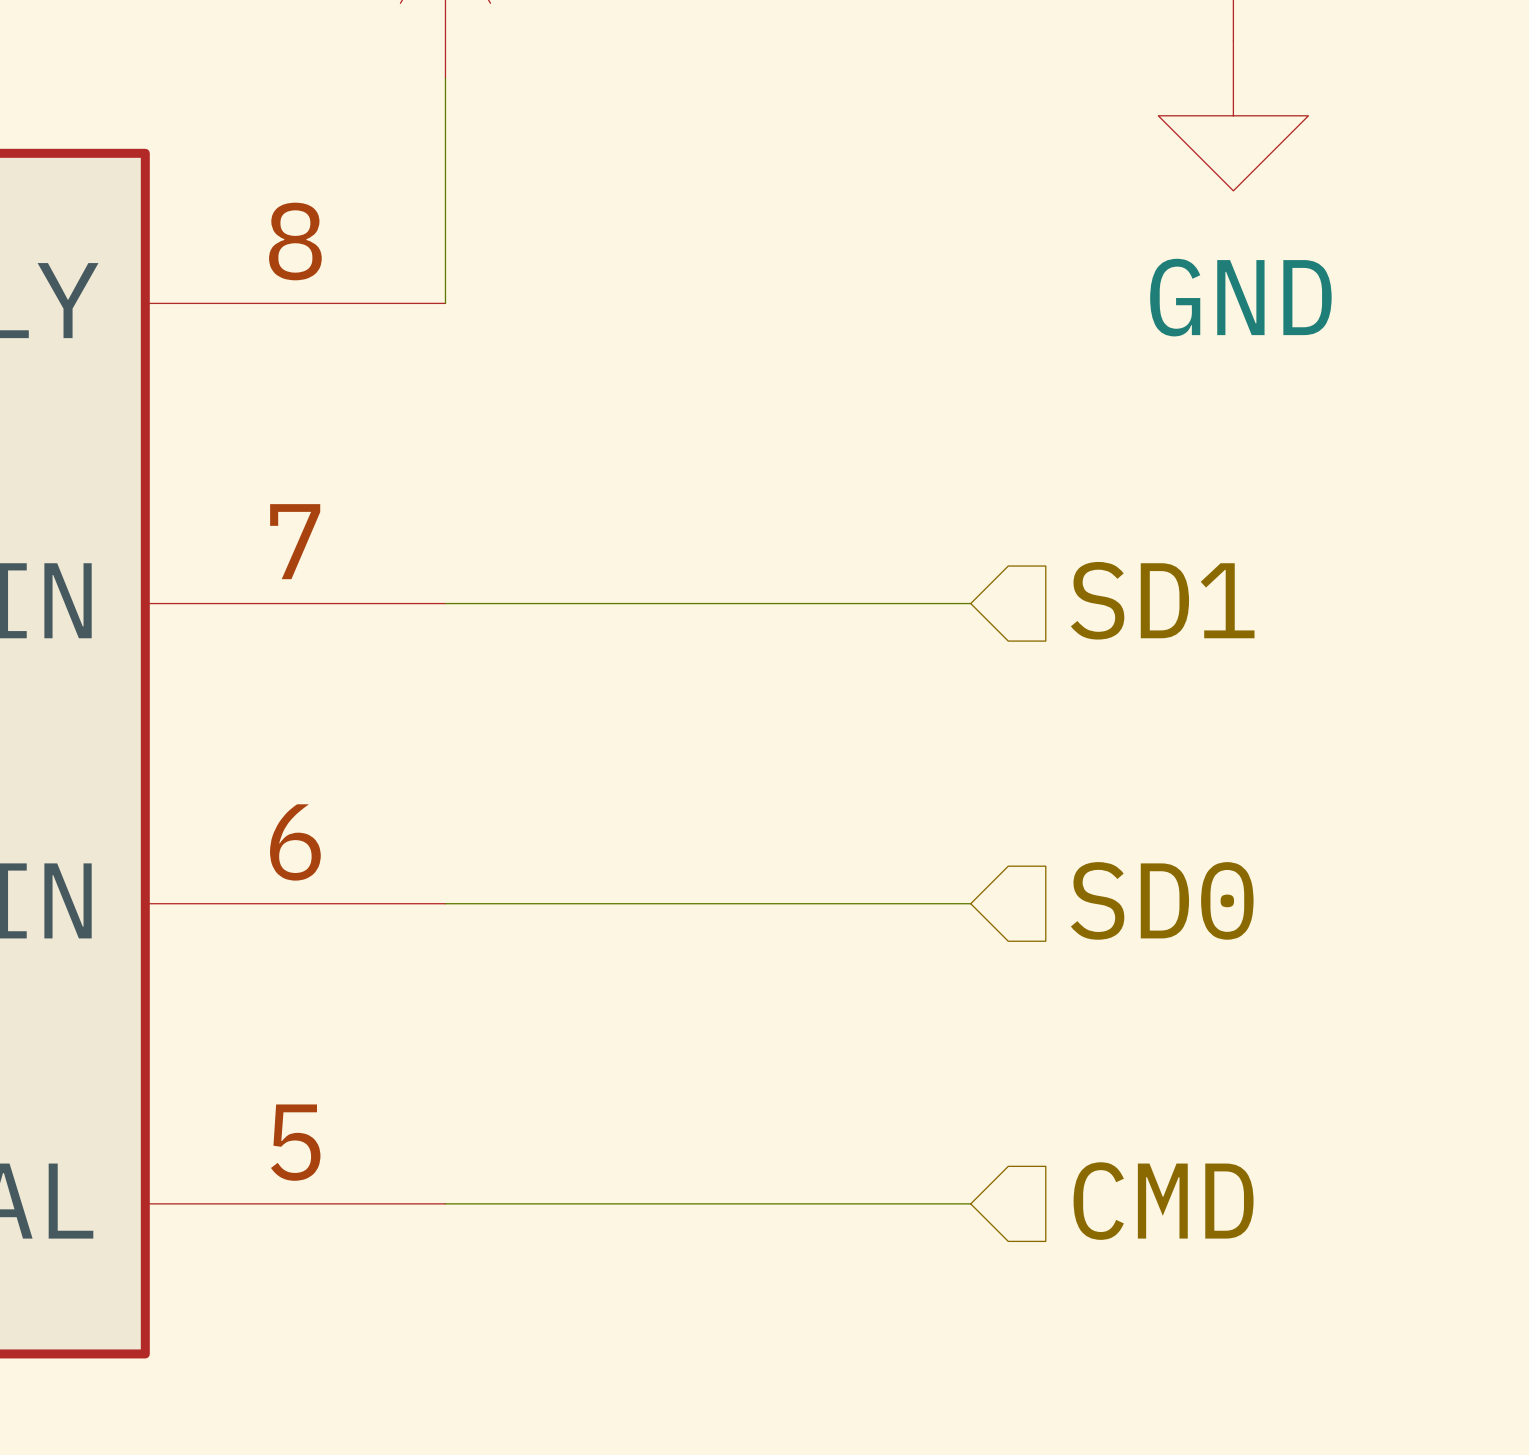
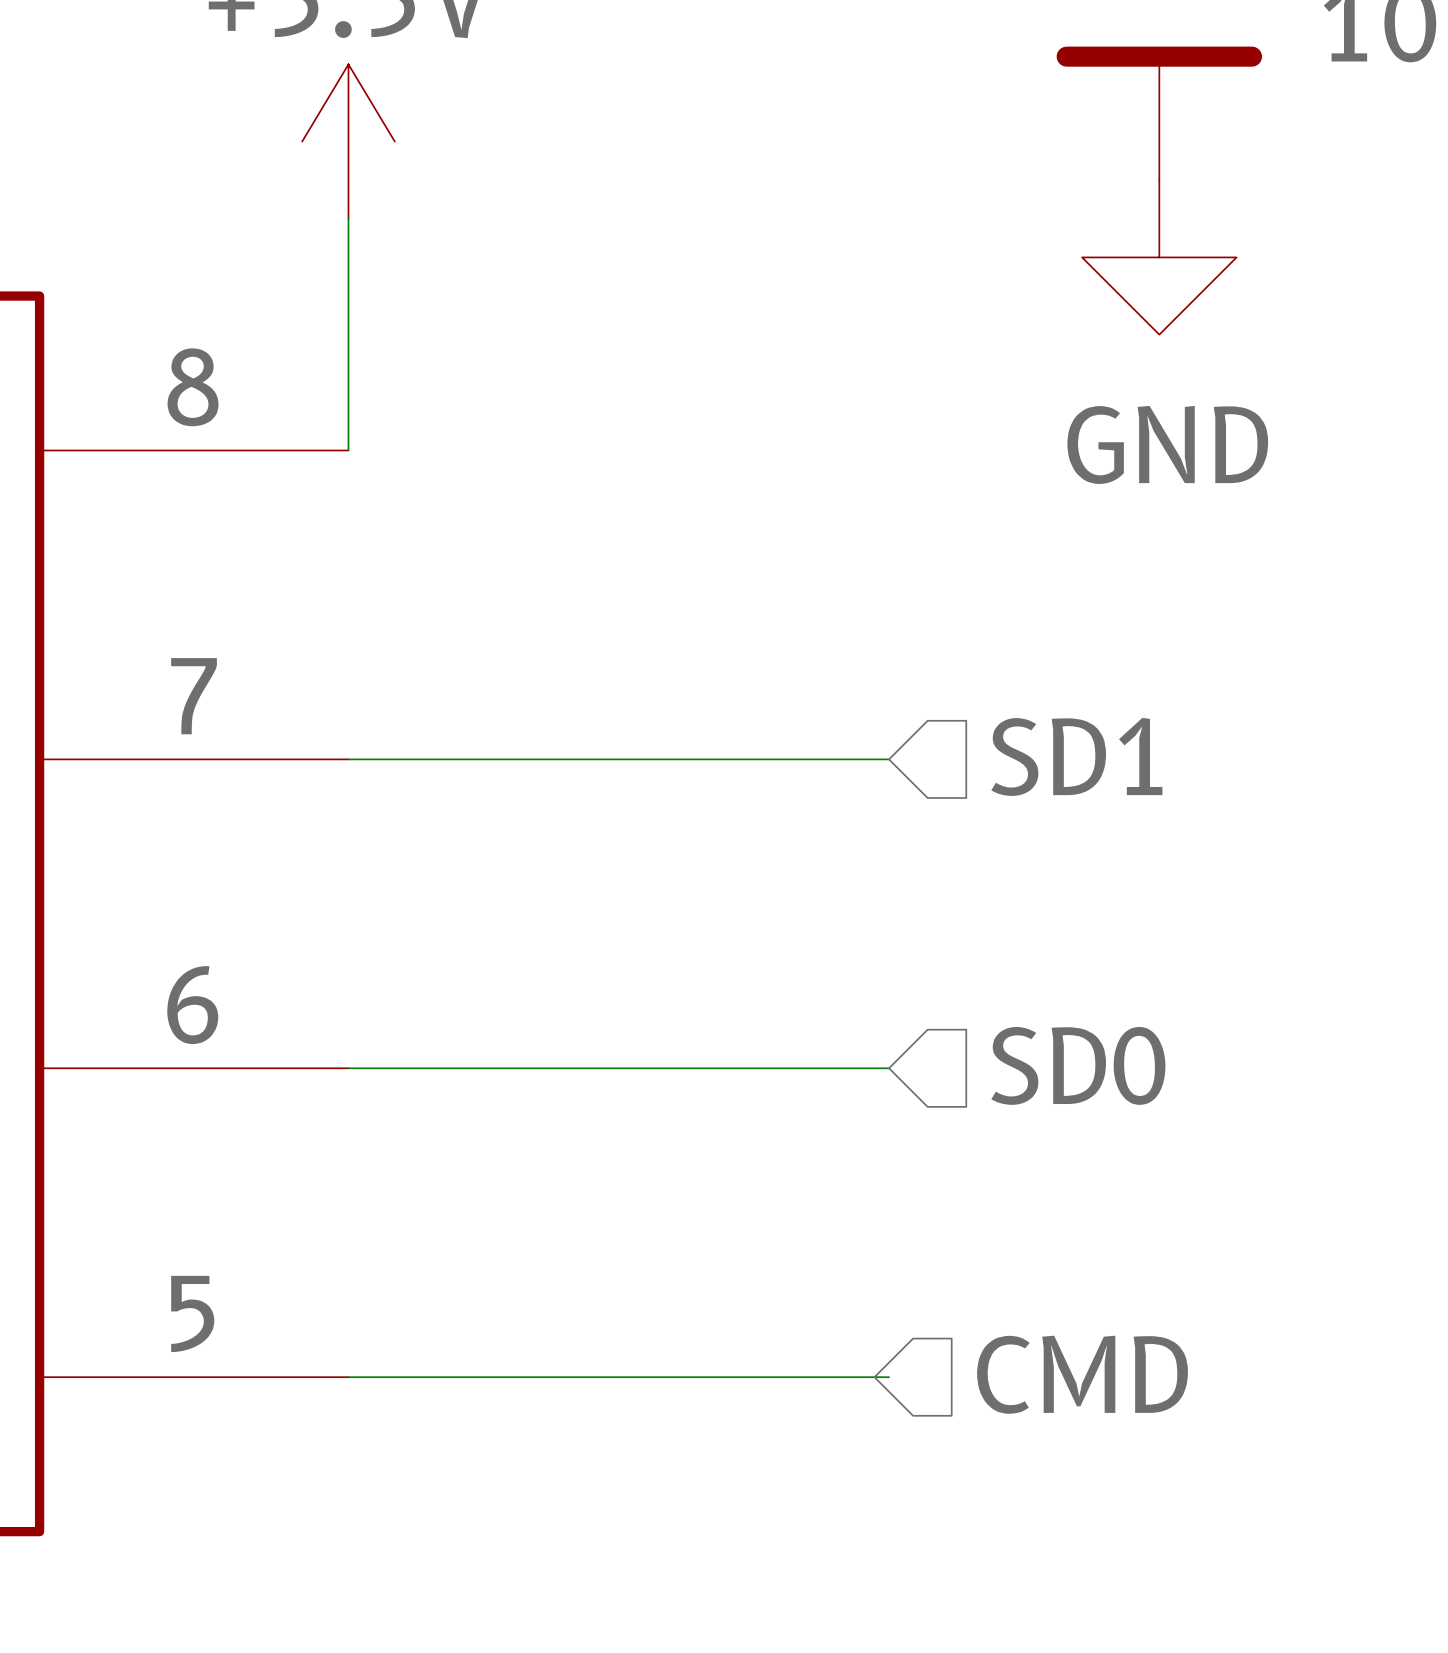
hierarchical label position: CMD (1163, 1201) -> CMD (1082, 1374)

